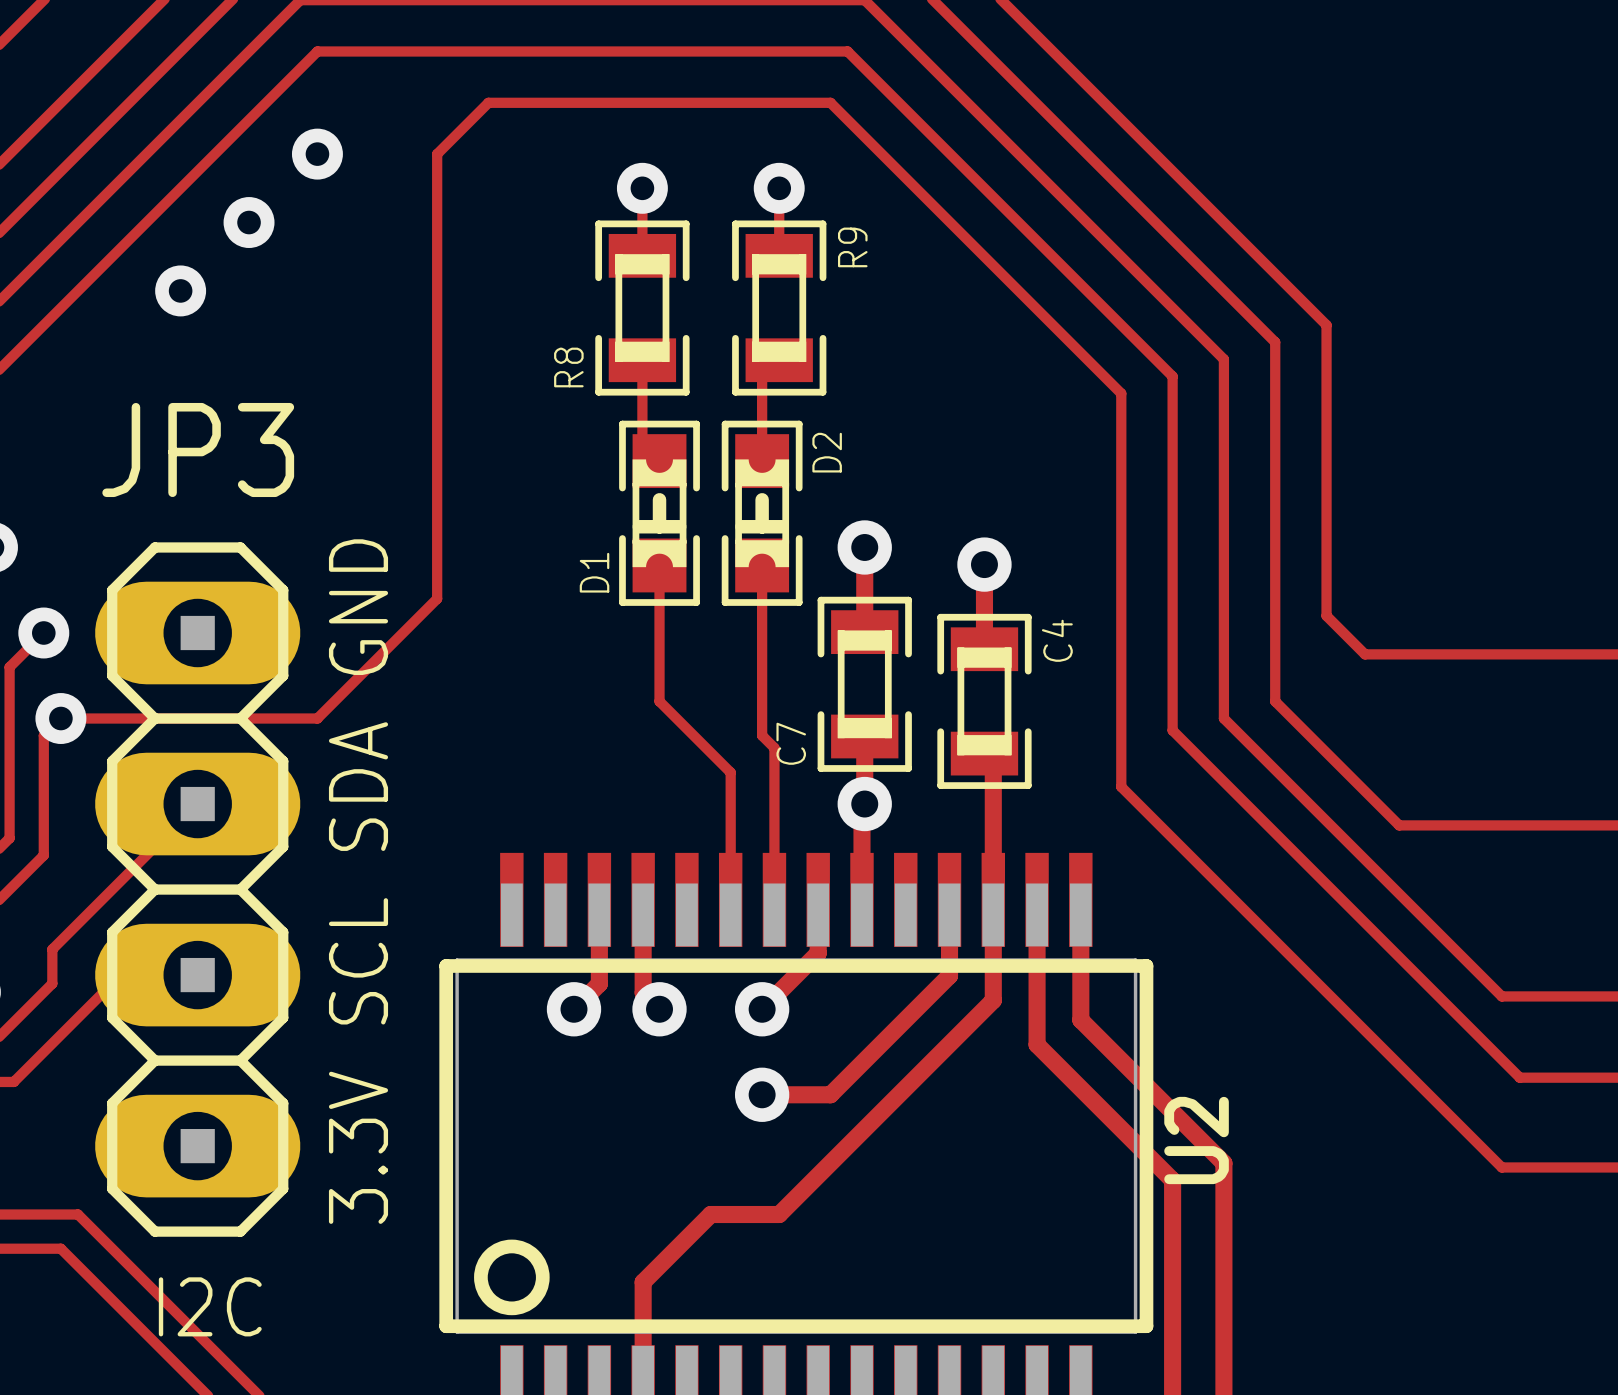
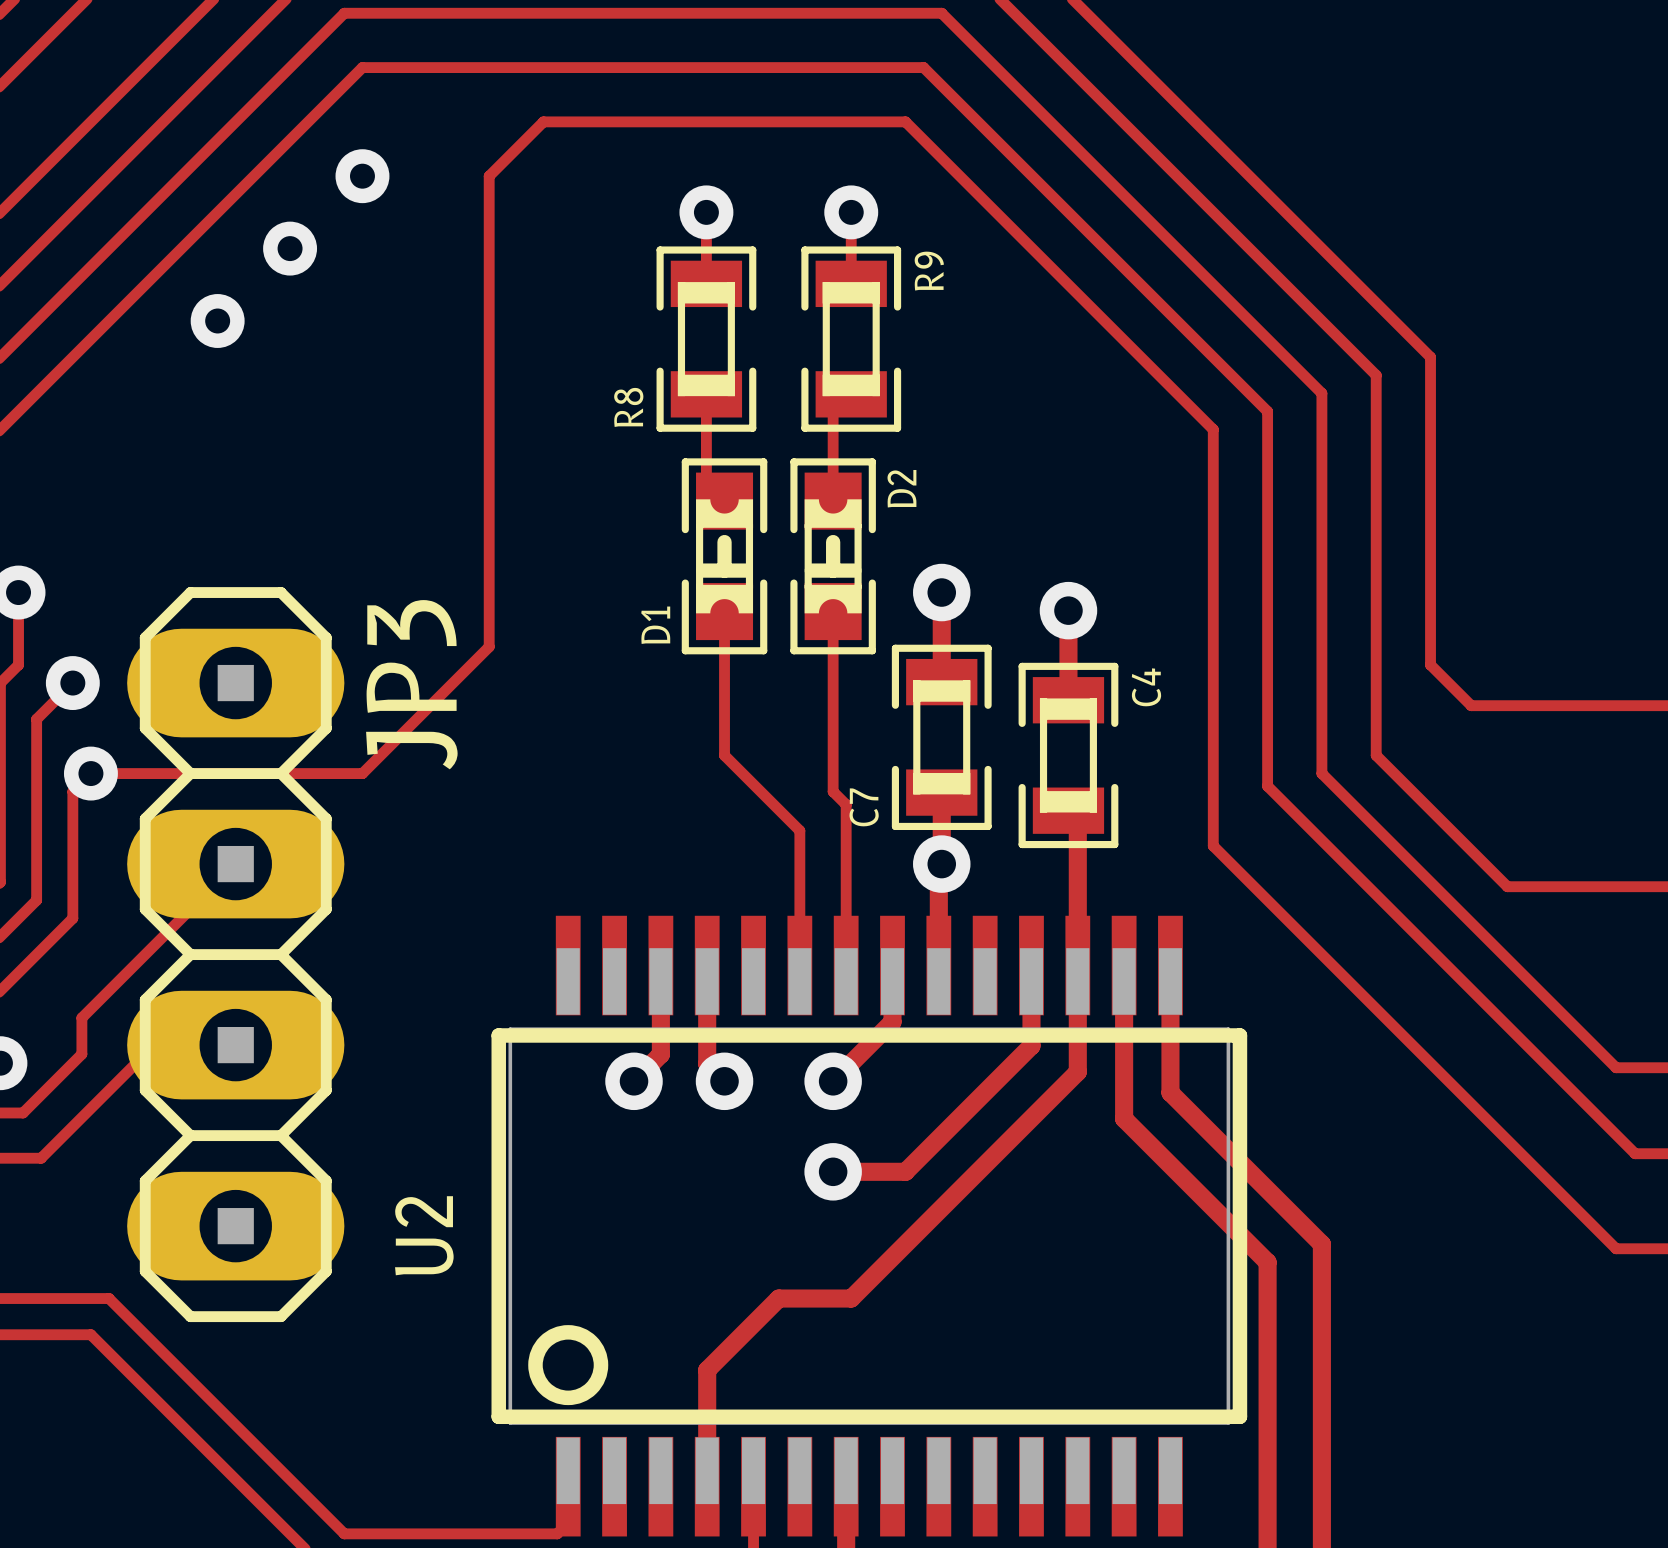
JP3 name rotation: 0° (198, 449) -> 90° counterclockwise (411, 684)
JP3 name position: JP3 (198, 449) -> JP3 (411, 684)
text: 3.3V SCL SDA GND (358, 881) -> none
U2 name position: U2 (1196, 1140) -> U2 (424, 1235)
text: I2C (210, 1306) -> none

